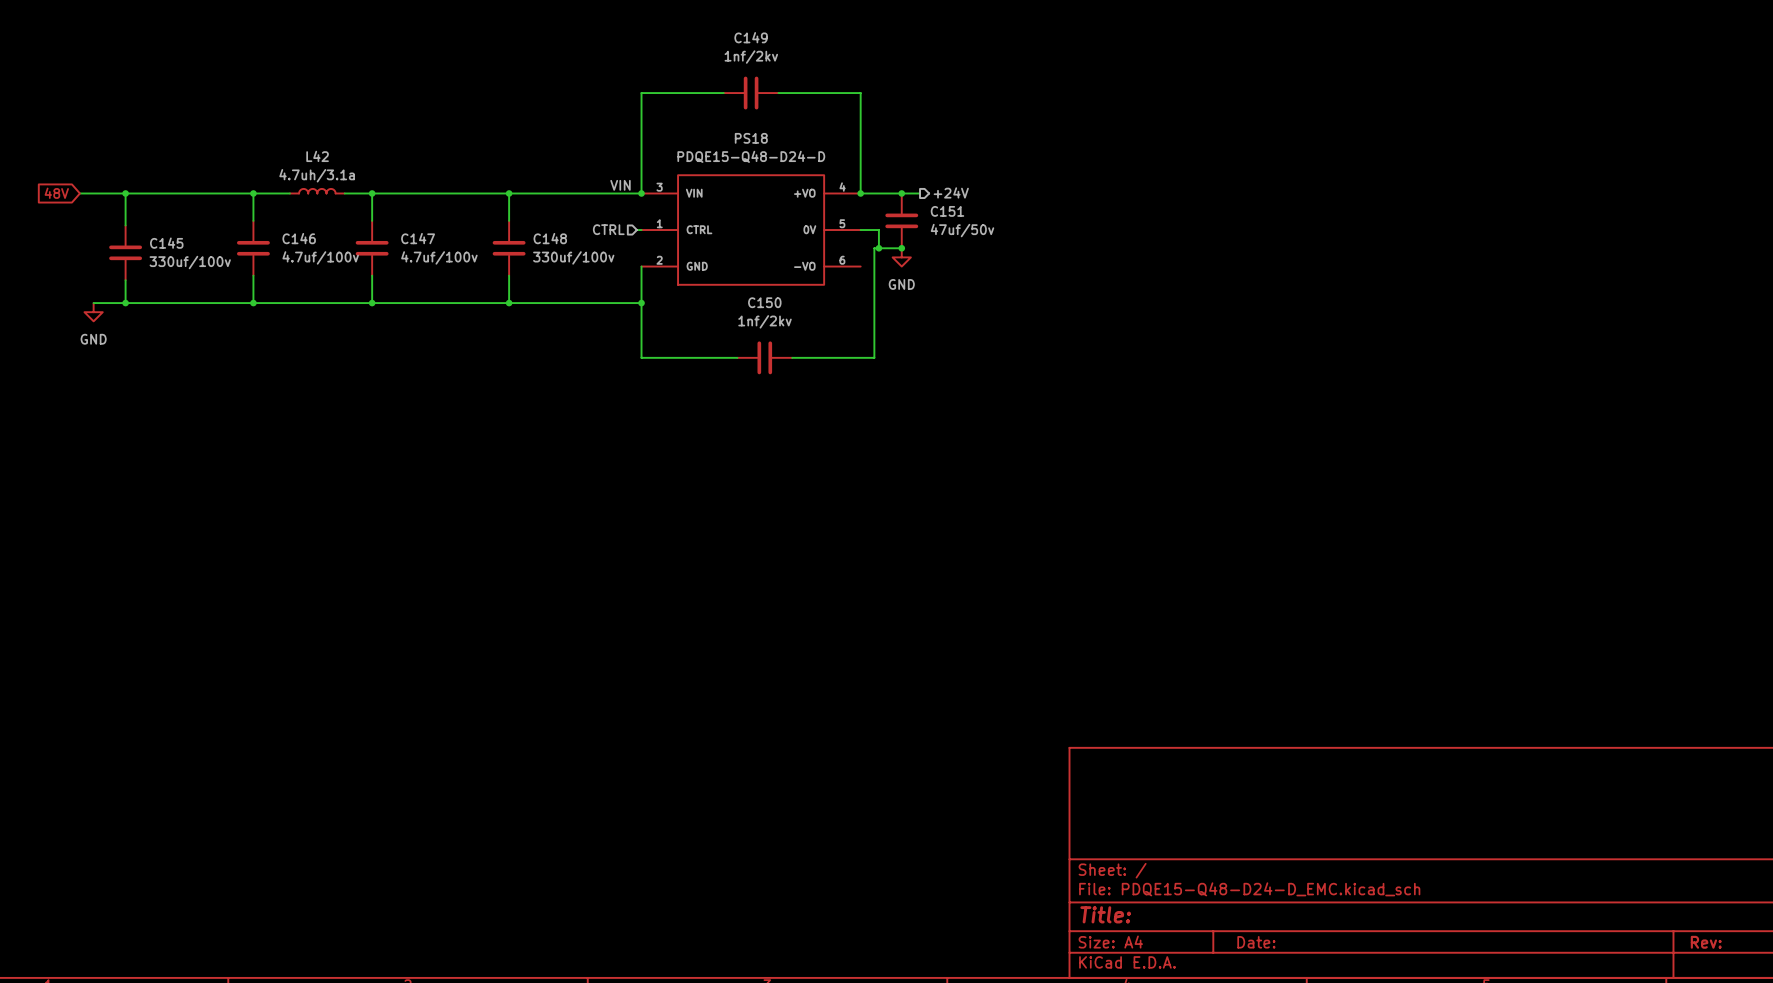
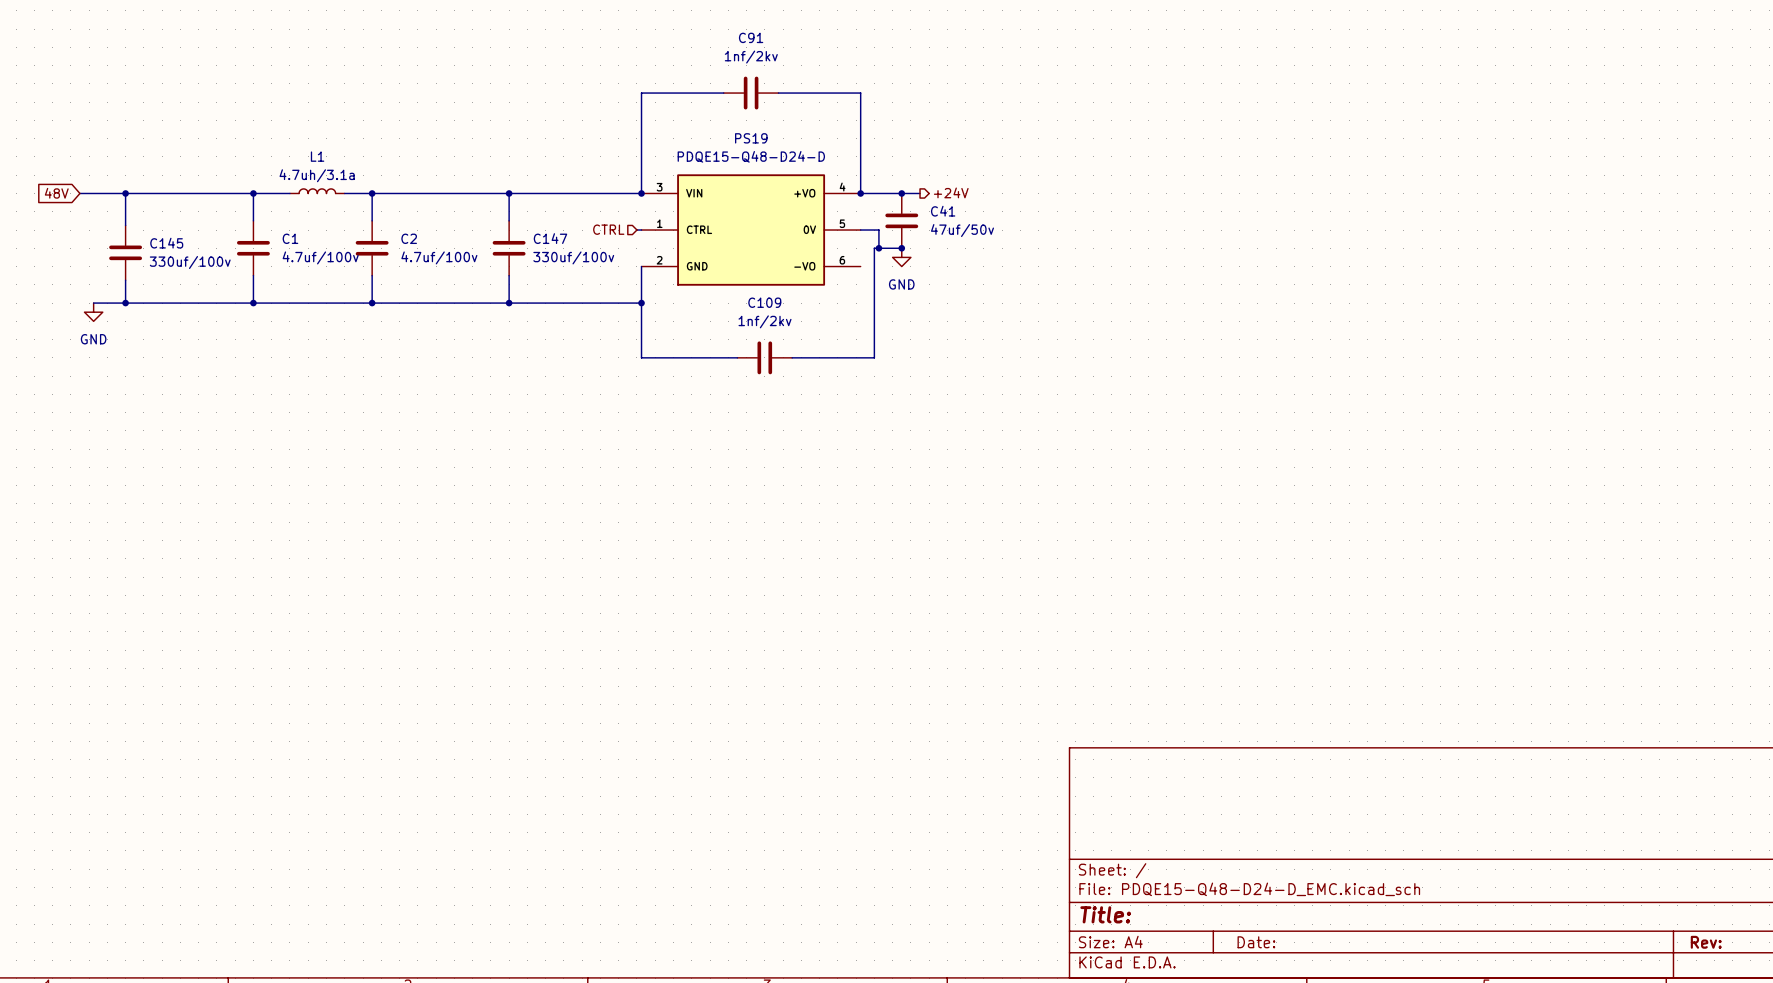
C149 name: C149 (751, 37) -> C91 (751, 37)
PS18 name: PS18 (751, 138) -> PS19 (751, 138)
L42 name: L42 (317, 156) -> L1 (317, 156)
label: VIN (620, 185) -> none
C151 name: C151 (947, 211) -> C41 (943, 211)
C146 name: C146 (299, 238) -> C1 (290, 238)
C147 name: C147 (418, 238) -> C2 (409, 238)
C148 name: C148 (550, 238) -> C147 (550, 238)
C150 name: C150 (764, 302) -> C109 (764, 302)

